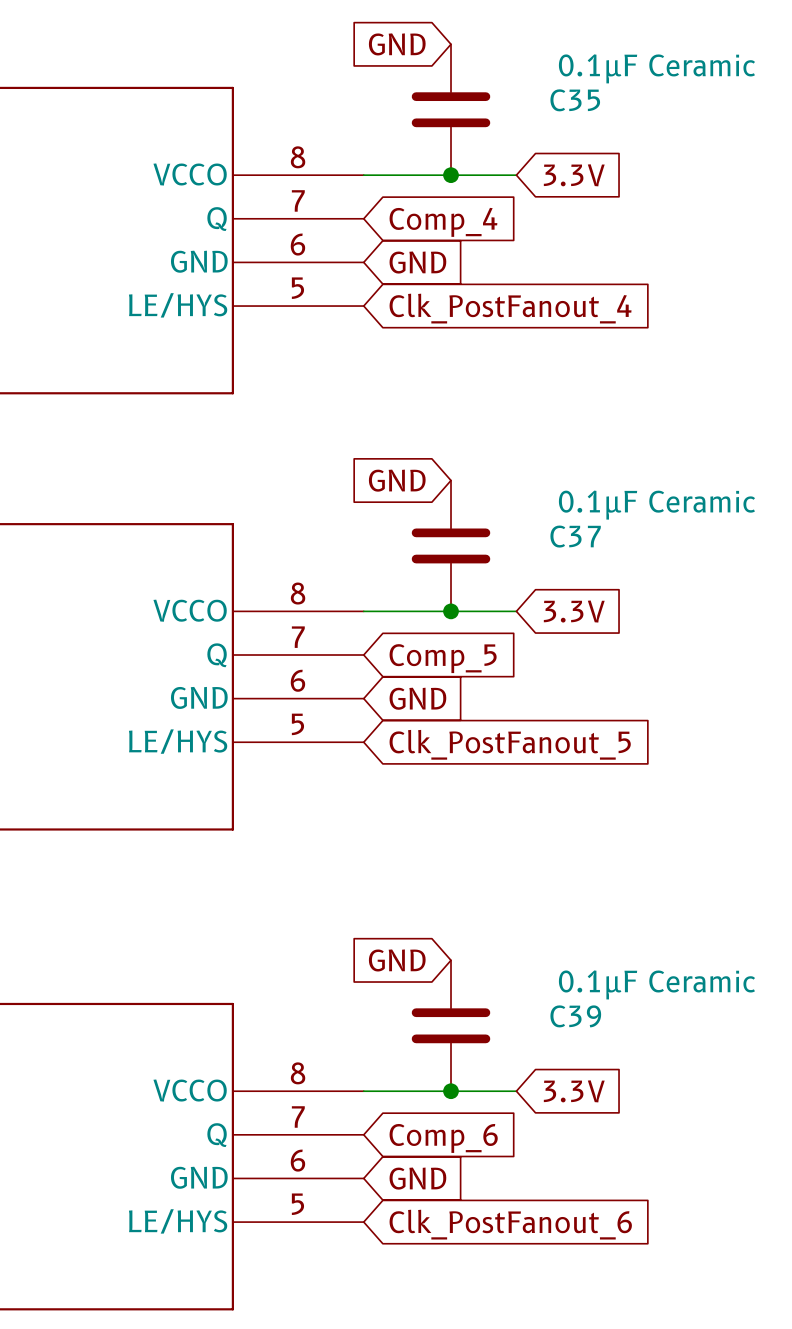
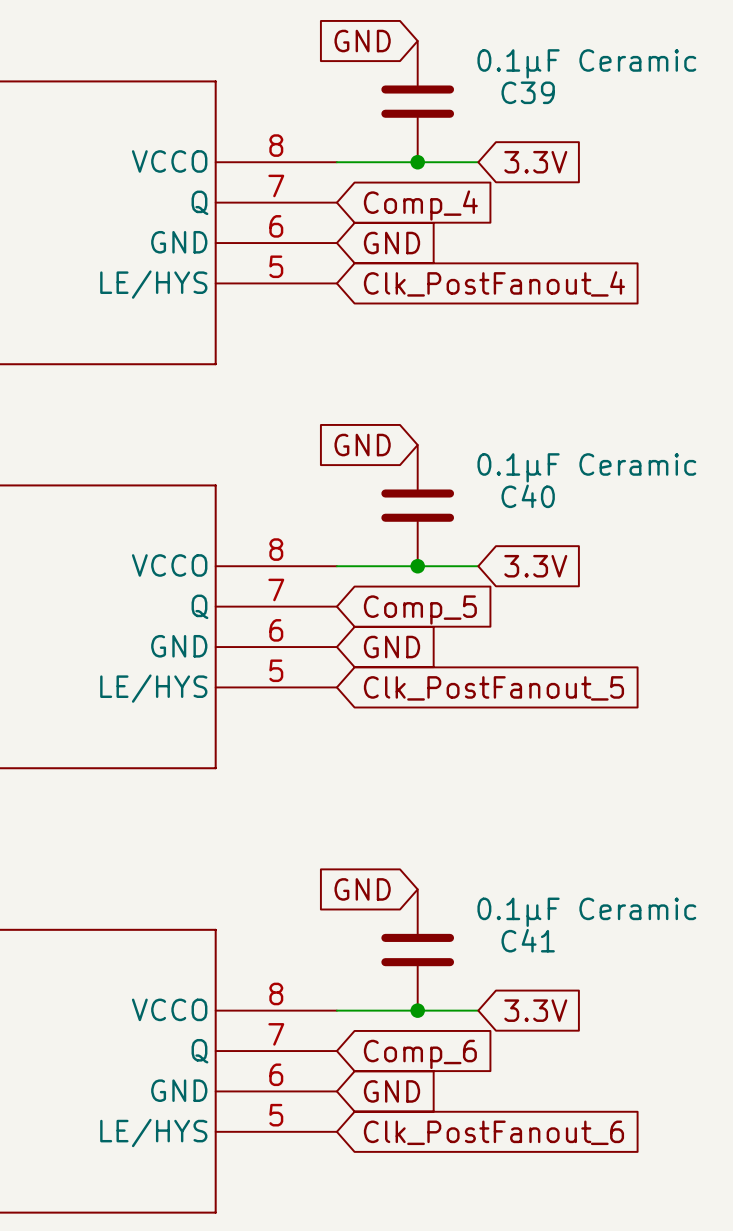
C35 name: C35 (575, 100) -> C39 (528, 92)
C37 name: C37 (575, 536) -> C40 (528, 496)
C39 name: C39 (575, 1016) -> C41 (528, 940)

